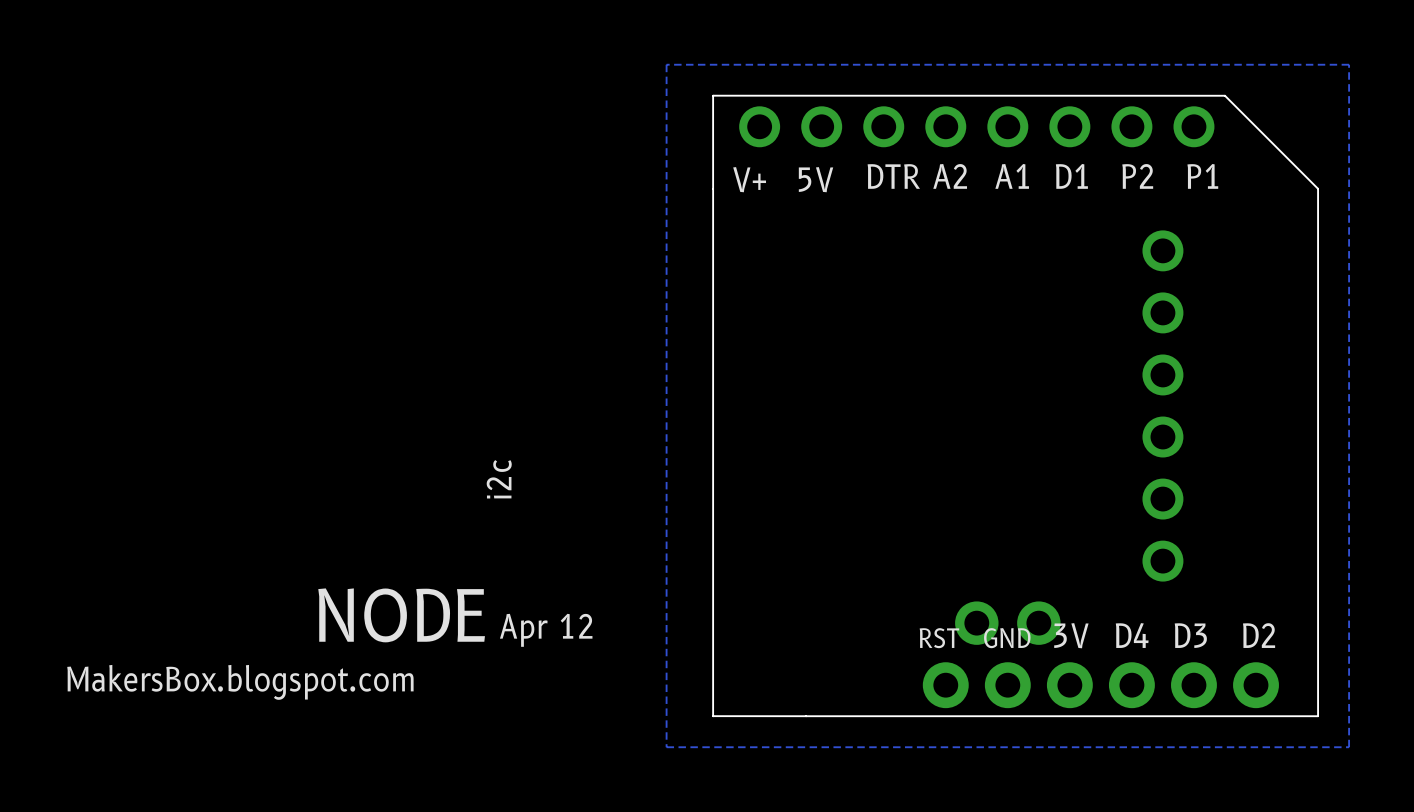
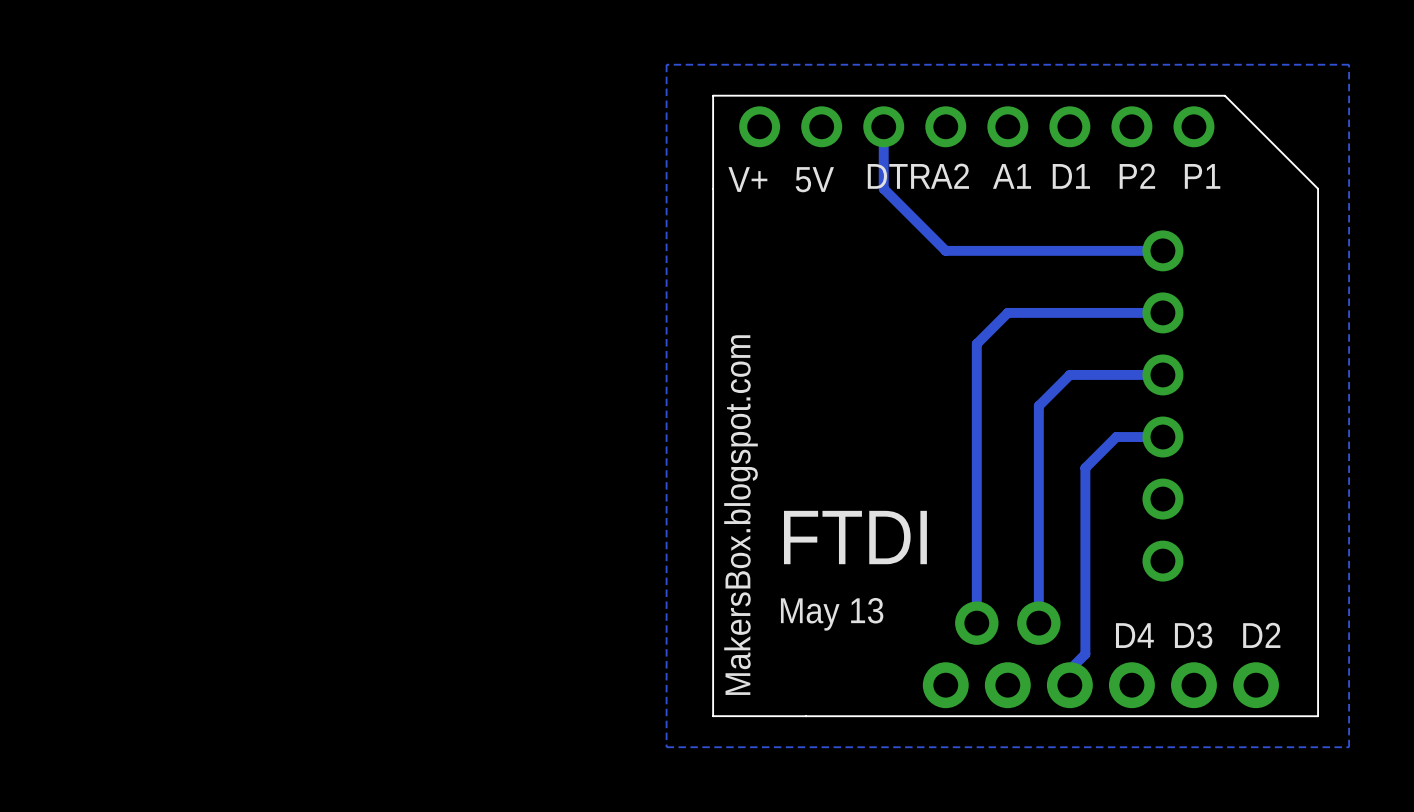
track: none -> (883, 126) (883, 188) (945, 250) (1162, 250)
track: none -> (1162, 312) (1007, 312) (976, 343) (976, 623)
track: none -> (1162, 374) (1069, 374) (1038, 405) (1038, 623)
track: none -> (1162, 437) (1116, 437) (1085, 468) (1085, 654) (1069, 669) (1069, 685)
text: i2c (499, 479) -> none
text: none -> MakersBox.blogspot.com (741, 515)
text: none -> FTDI (855, 537)
text: none -> May 13 (832, 614)
text: NODE (401, 615) -> none
text: Apr 12 (546, 630) -> none
text: 3V (1071, 635) -> none
text: RST (939, 638) -> none
text: GND (1007, 638) -> none
text: MakersBox.blogspot.com (240, 682) -> none

